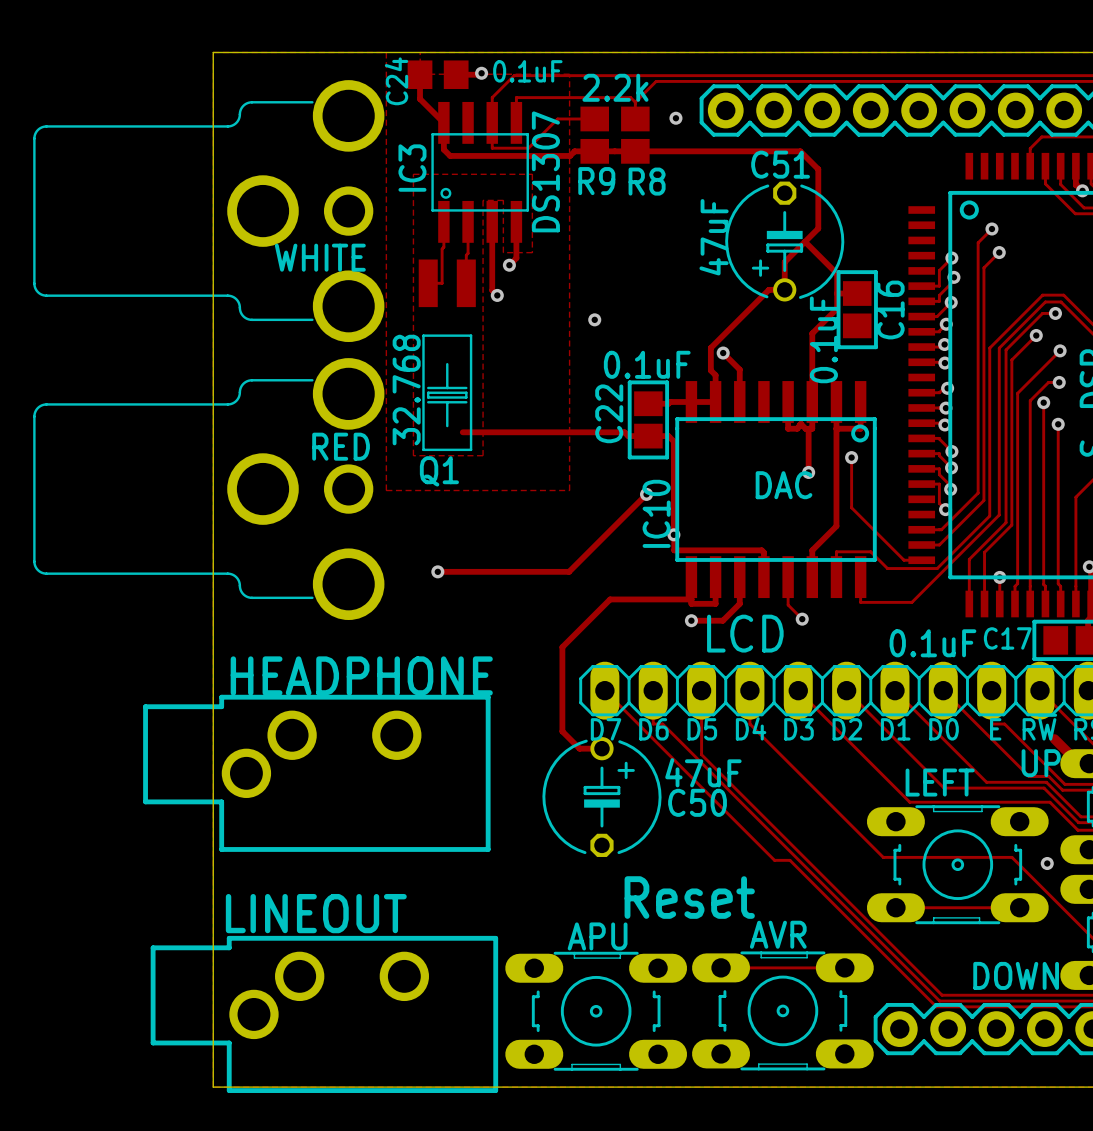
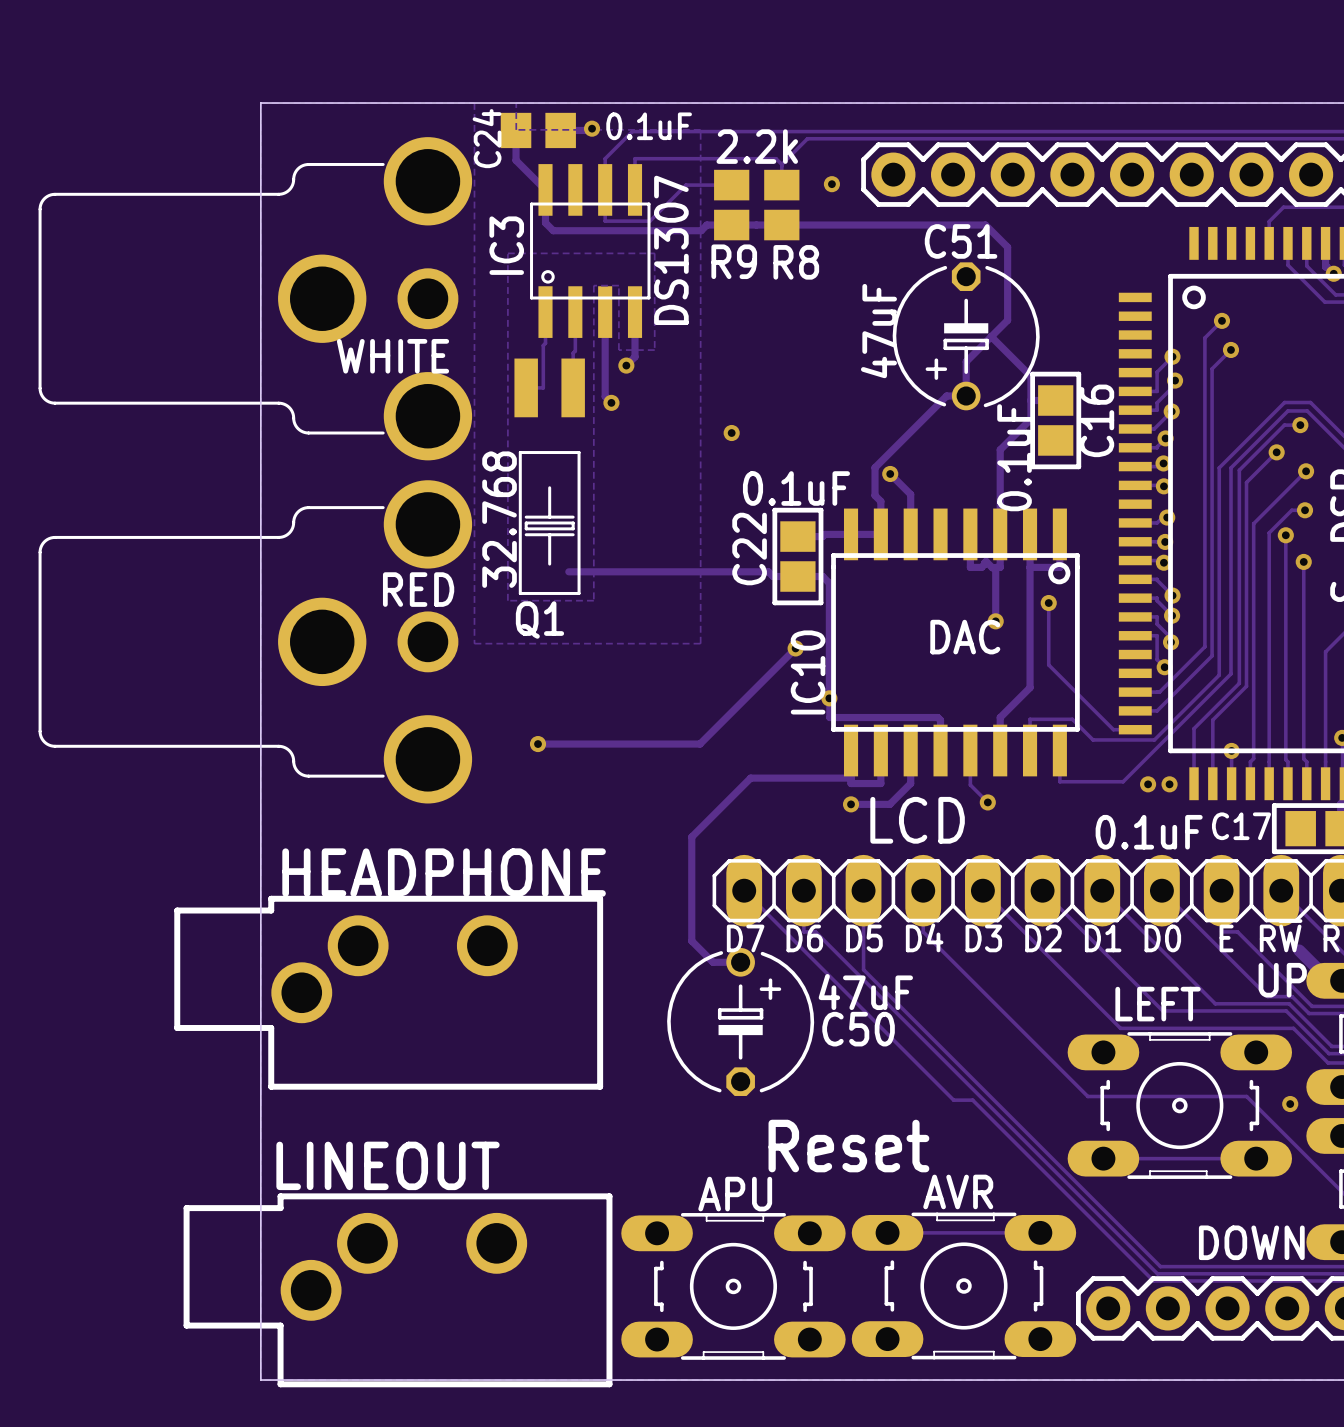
via: none -> (1148, 784)
via: none -> (1169, 784)

